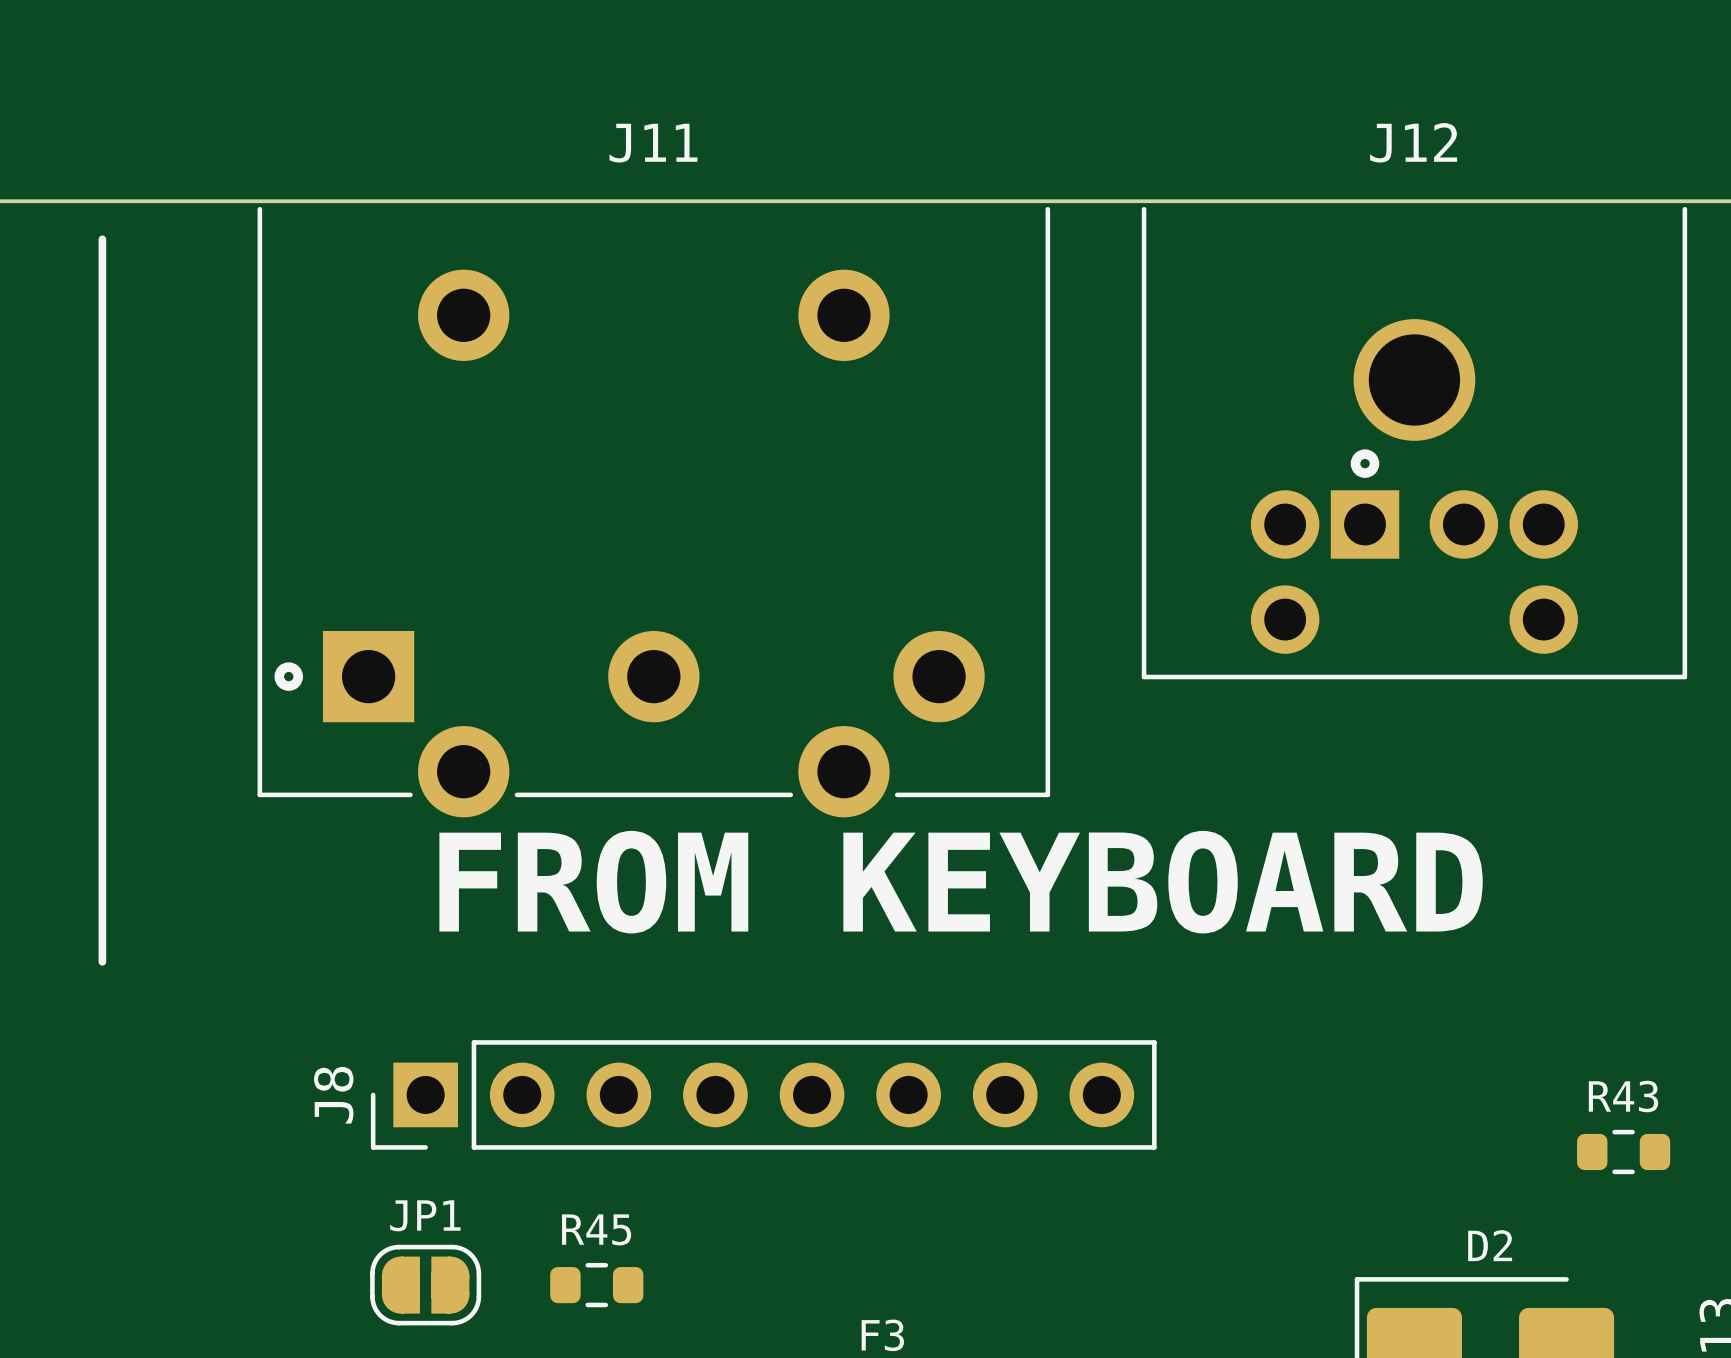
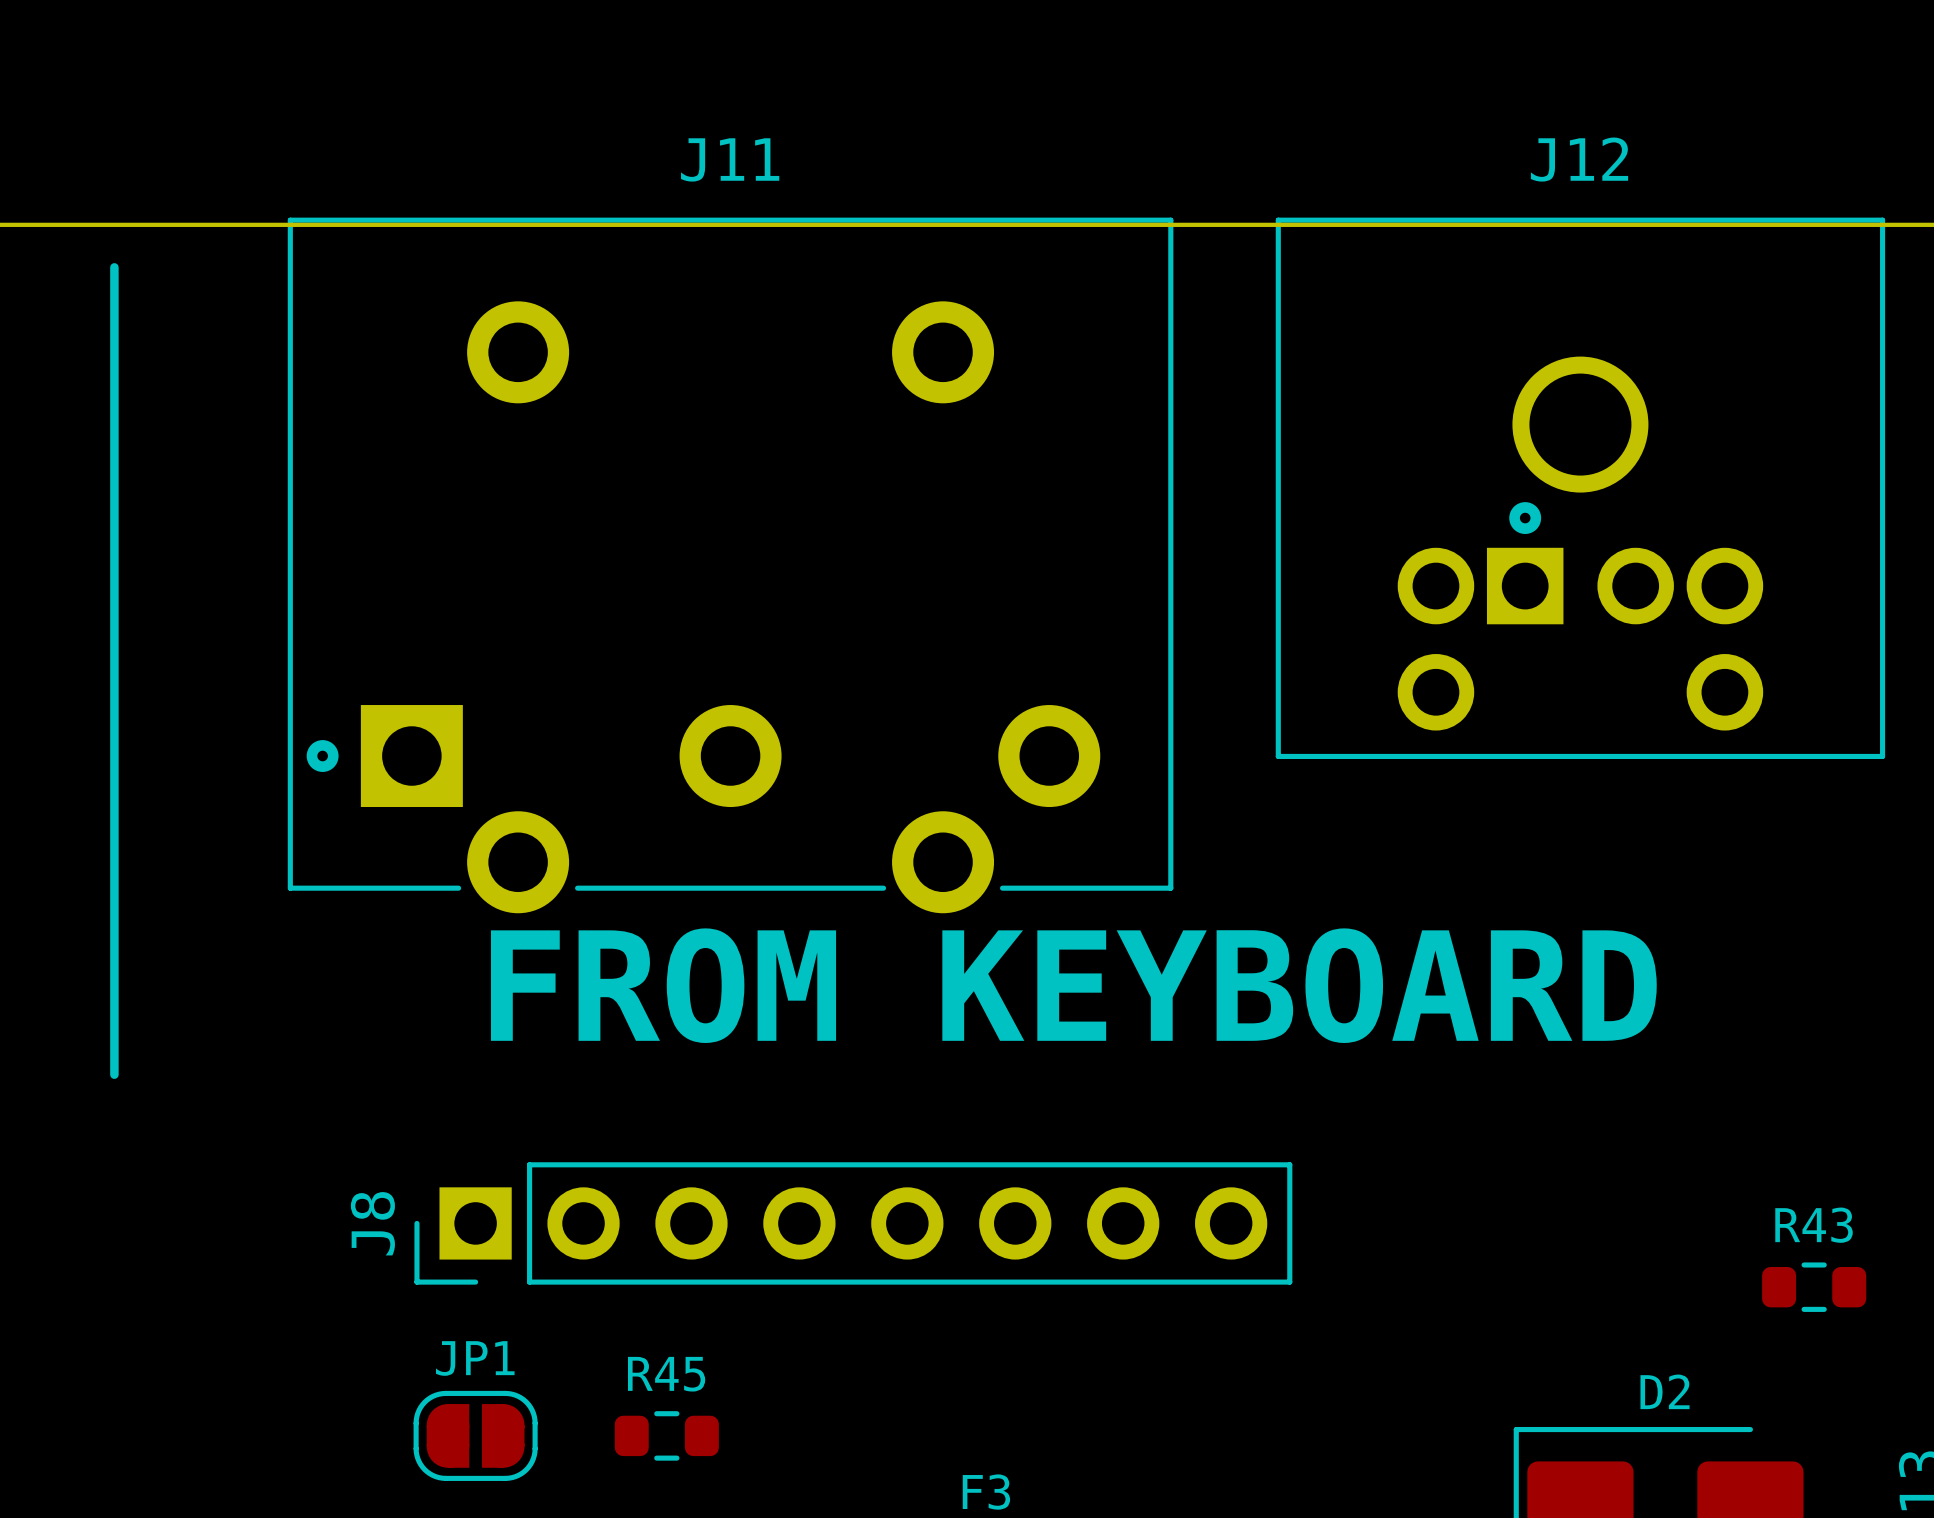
J11 footprint: [257, 206, 1051, 818] -> [287, 217, 1174, 914]
J12 footprint: [1141, 206, 1688, 680] -> [1275, 217, 1886, 759]

